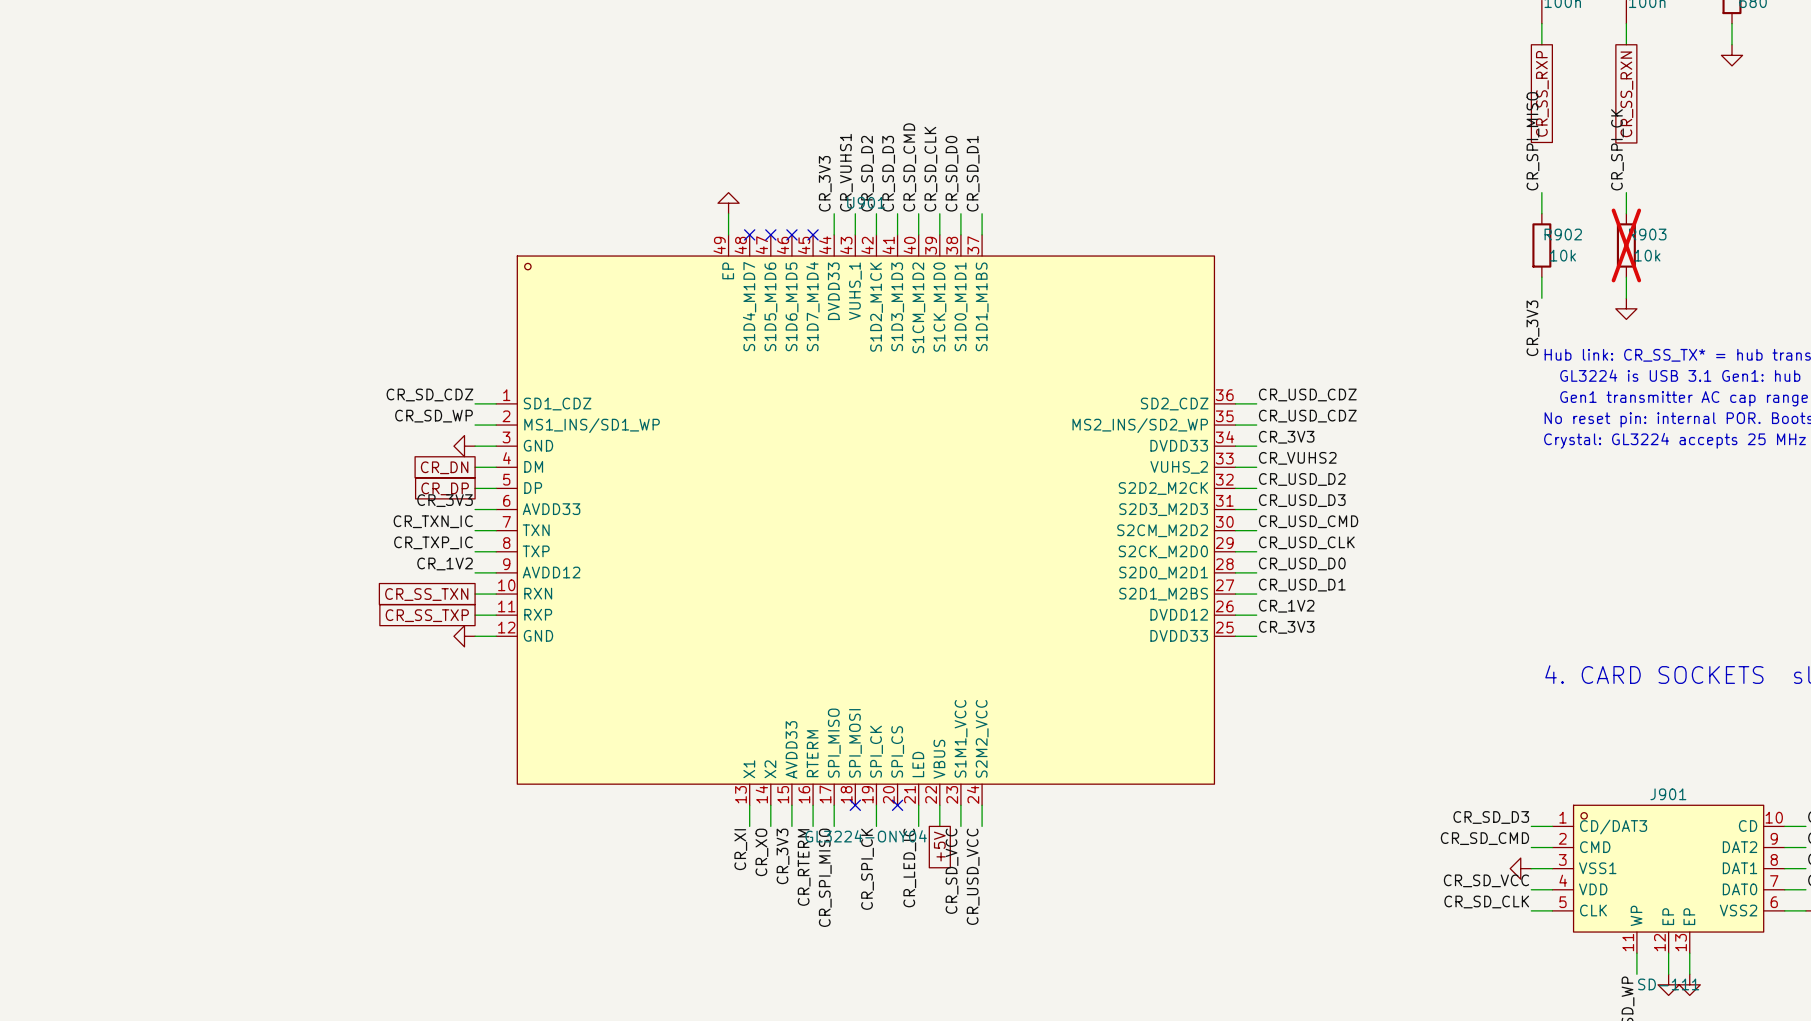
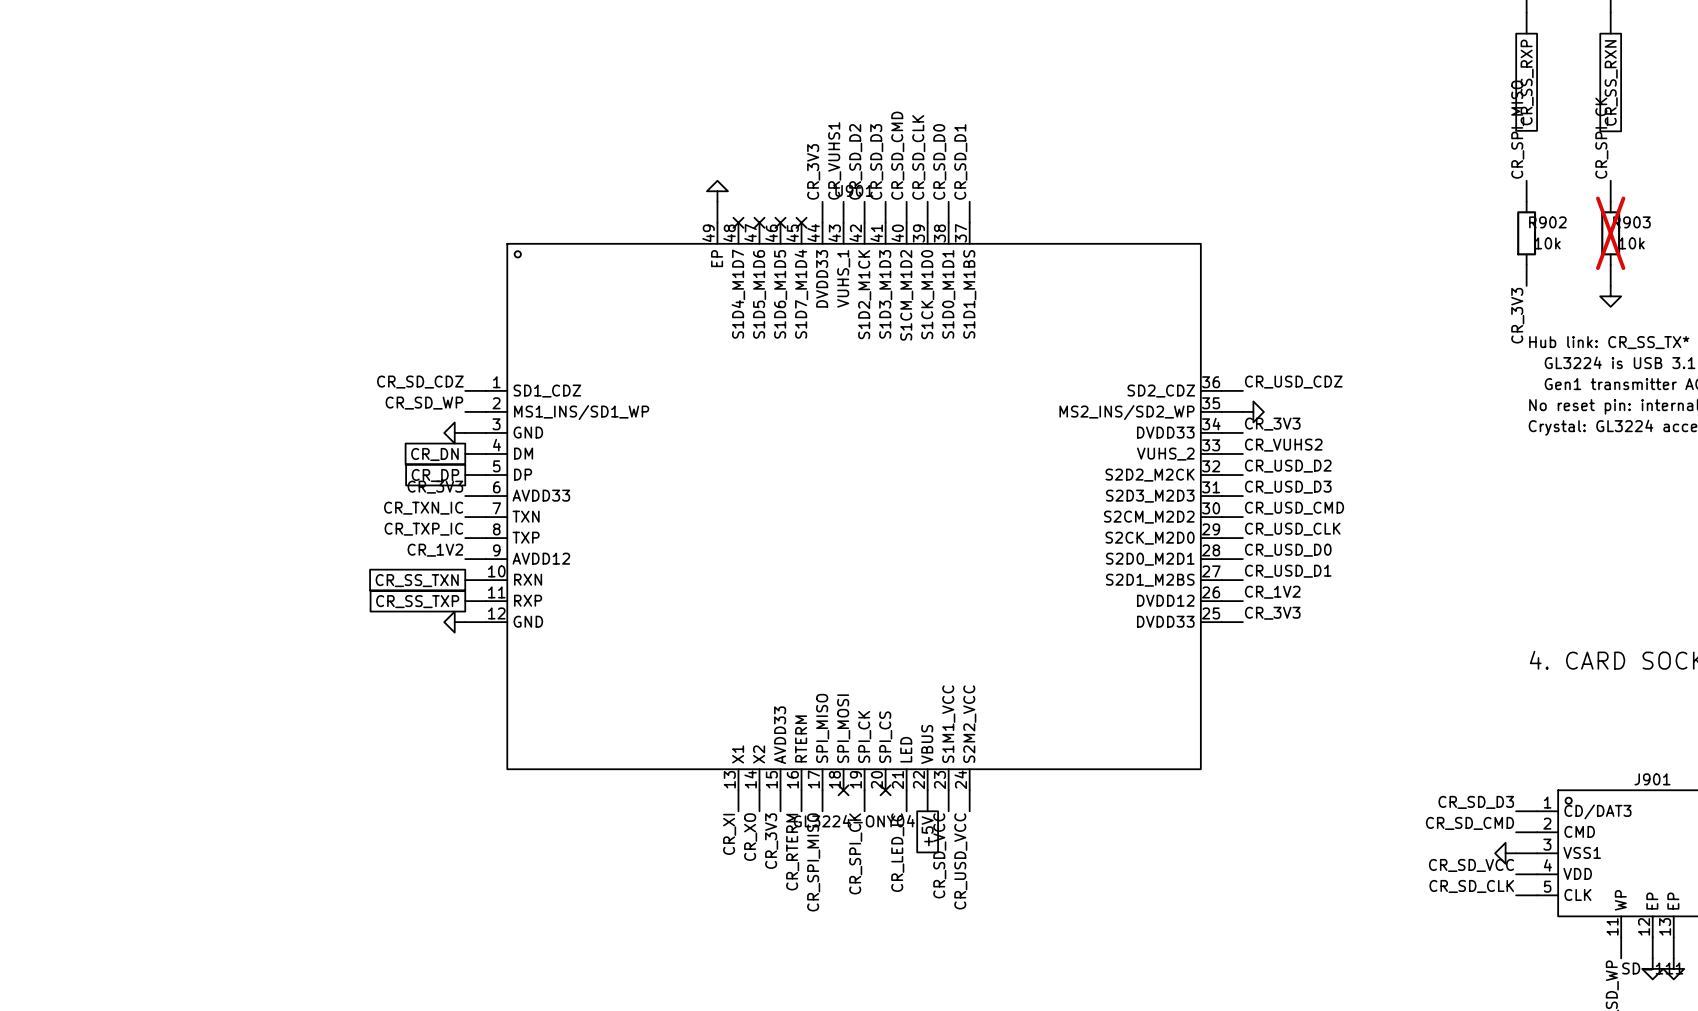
label: CR_USD_CDZ (1307, 416) -> none
power symbol: none -> (1253, 411)

